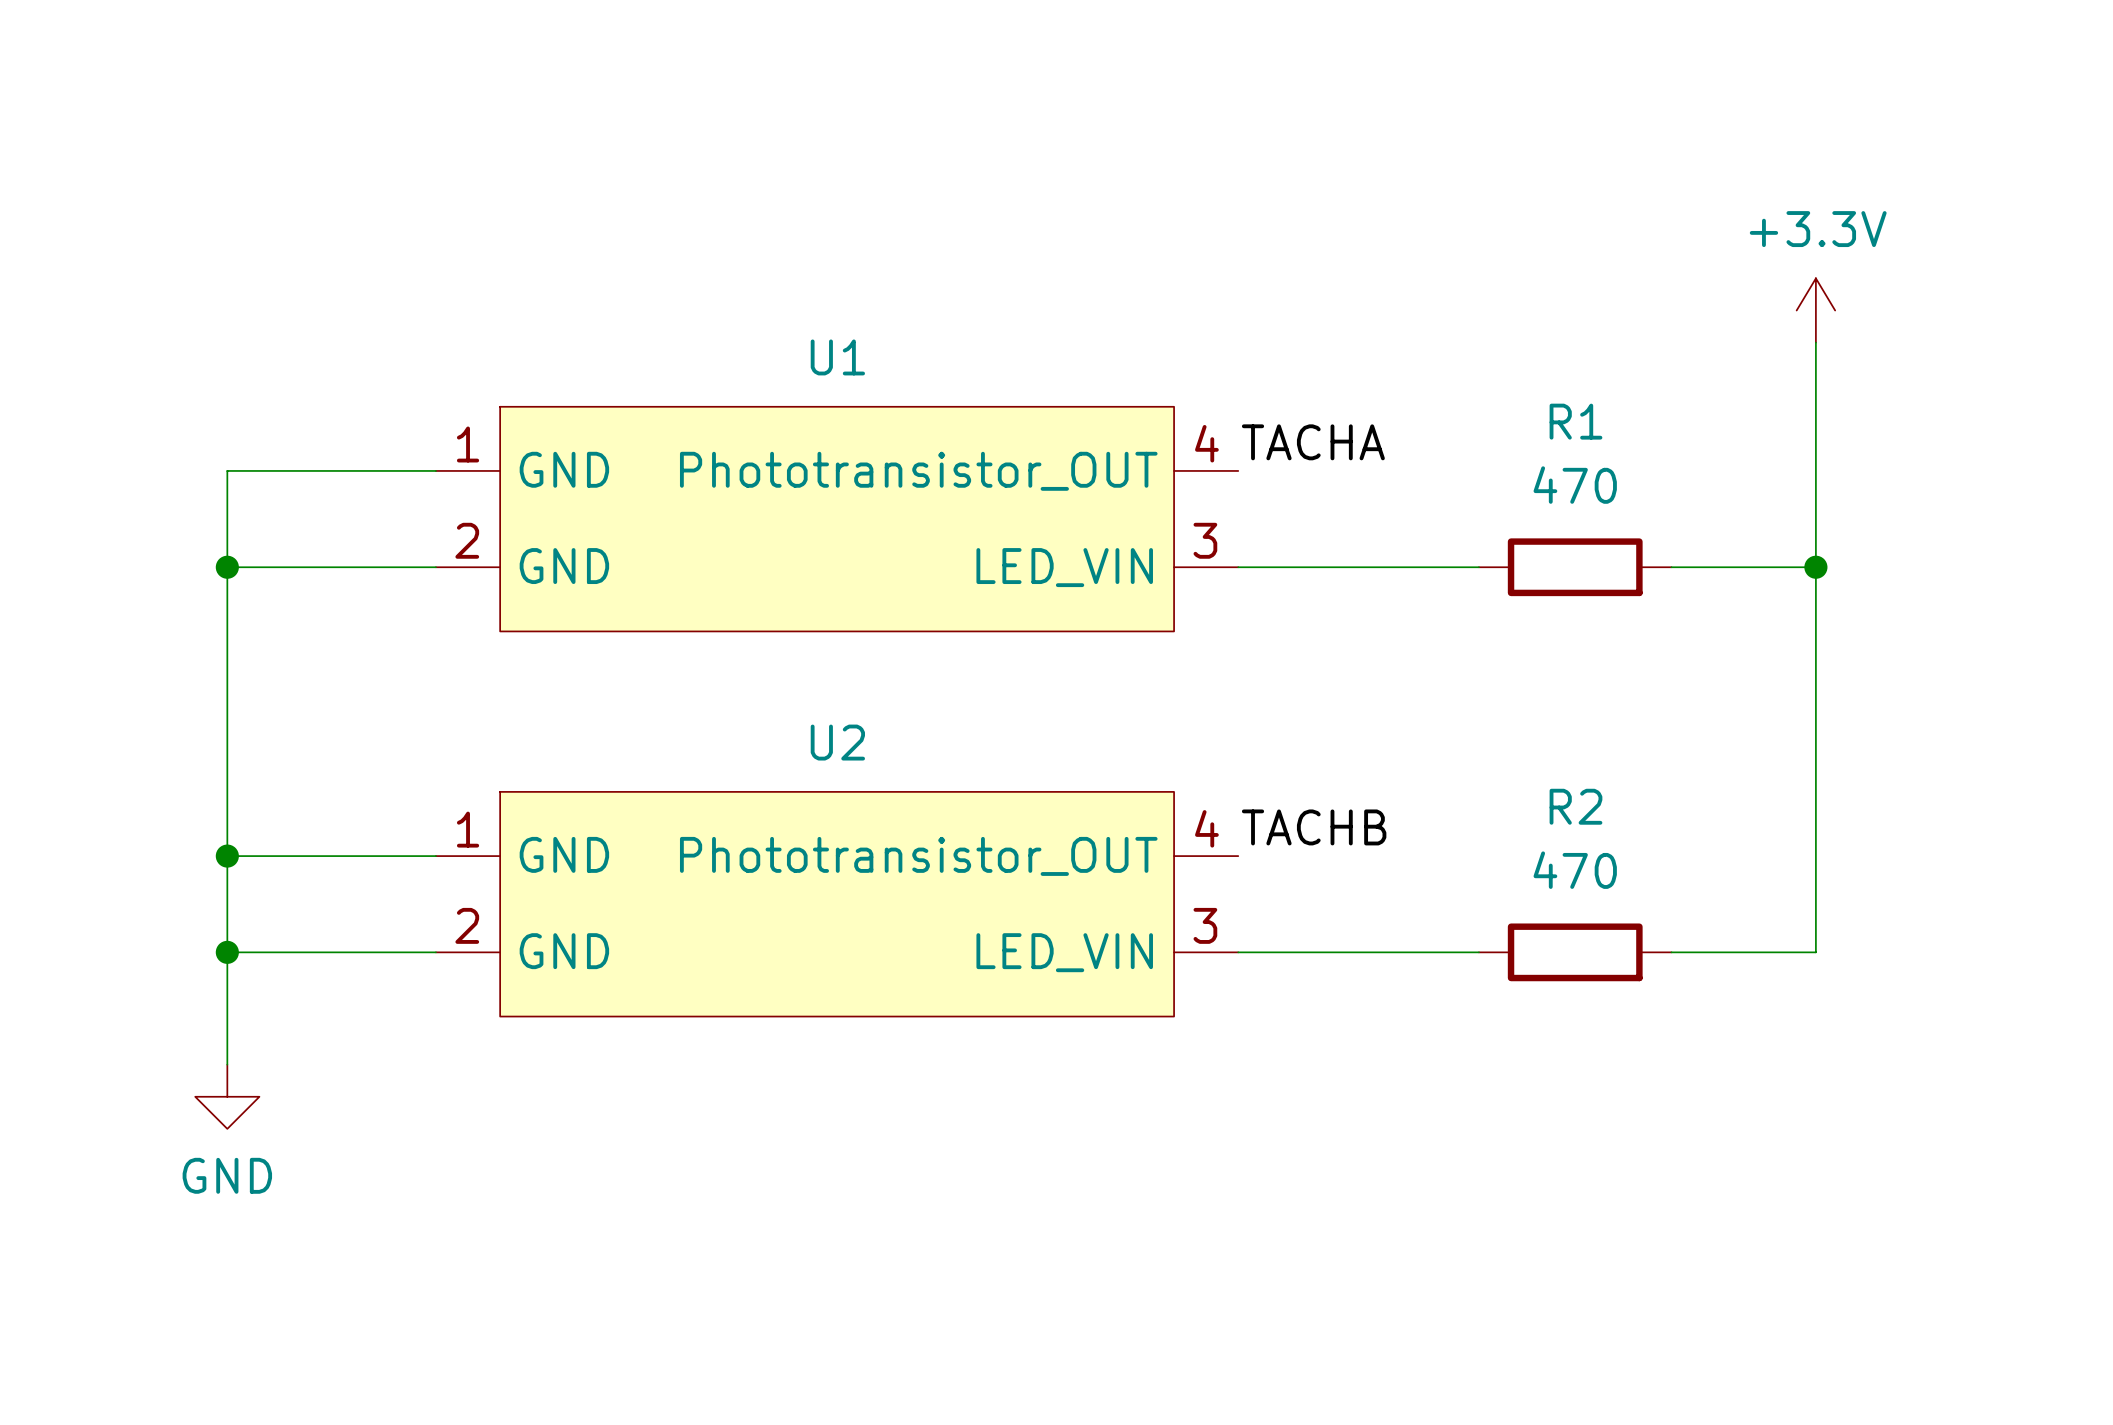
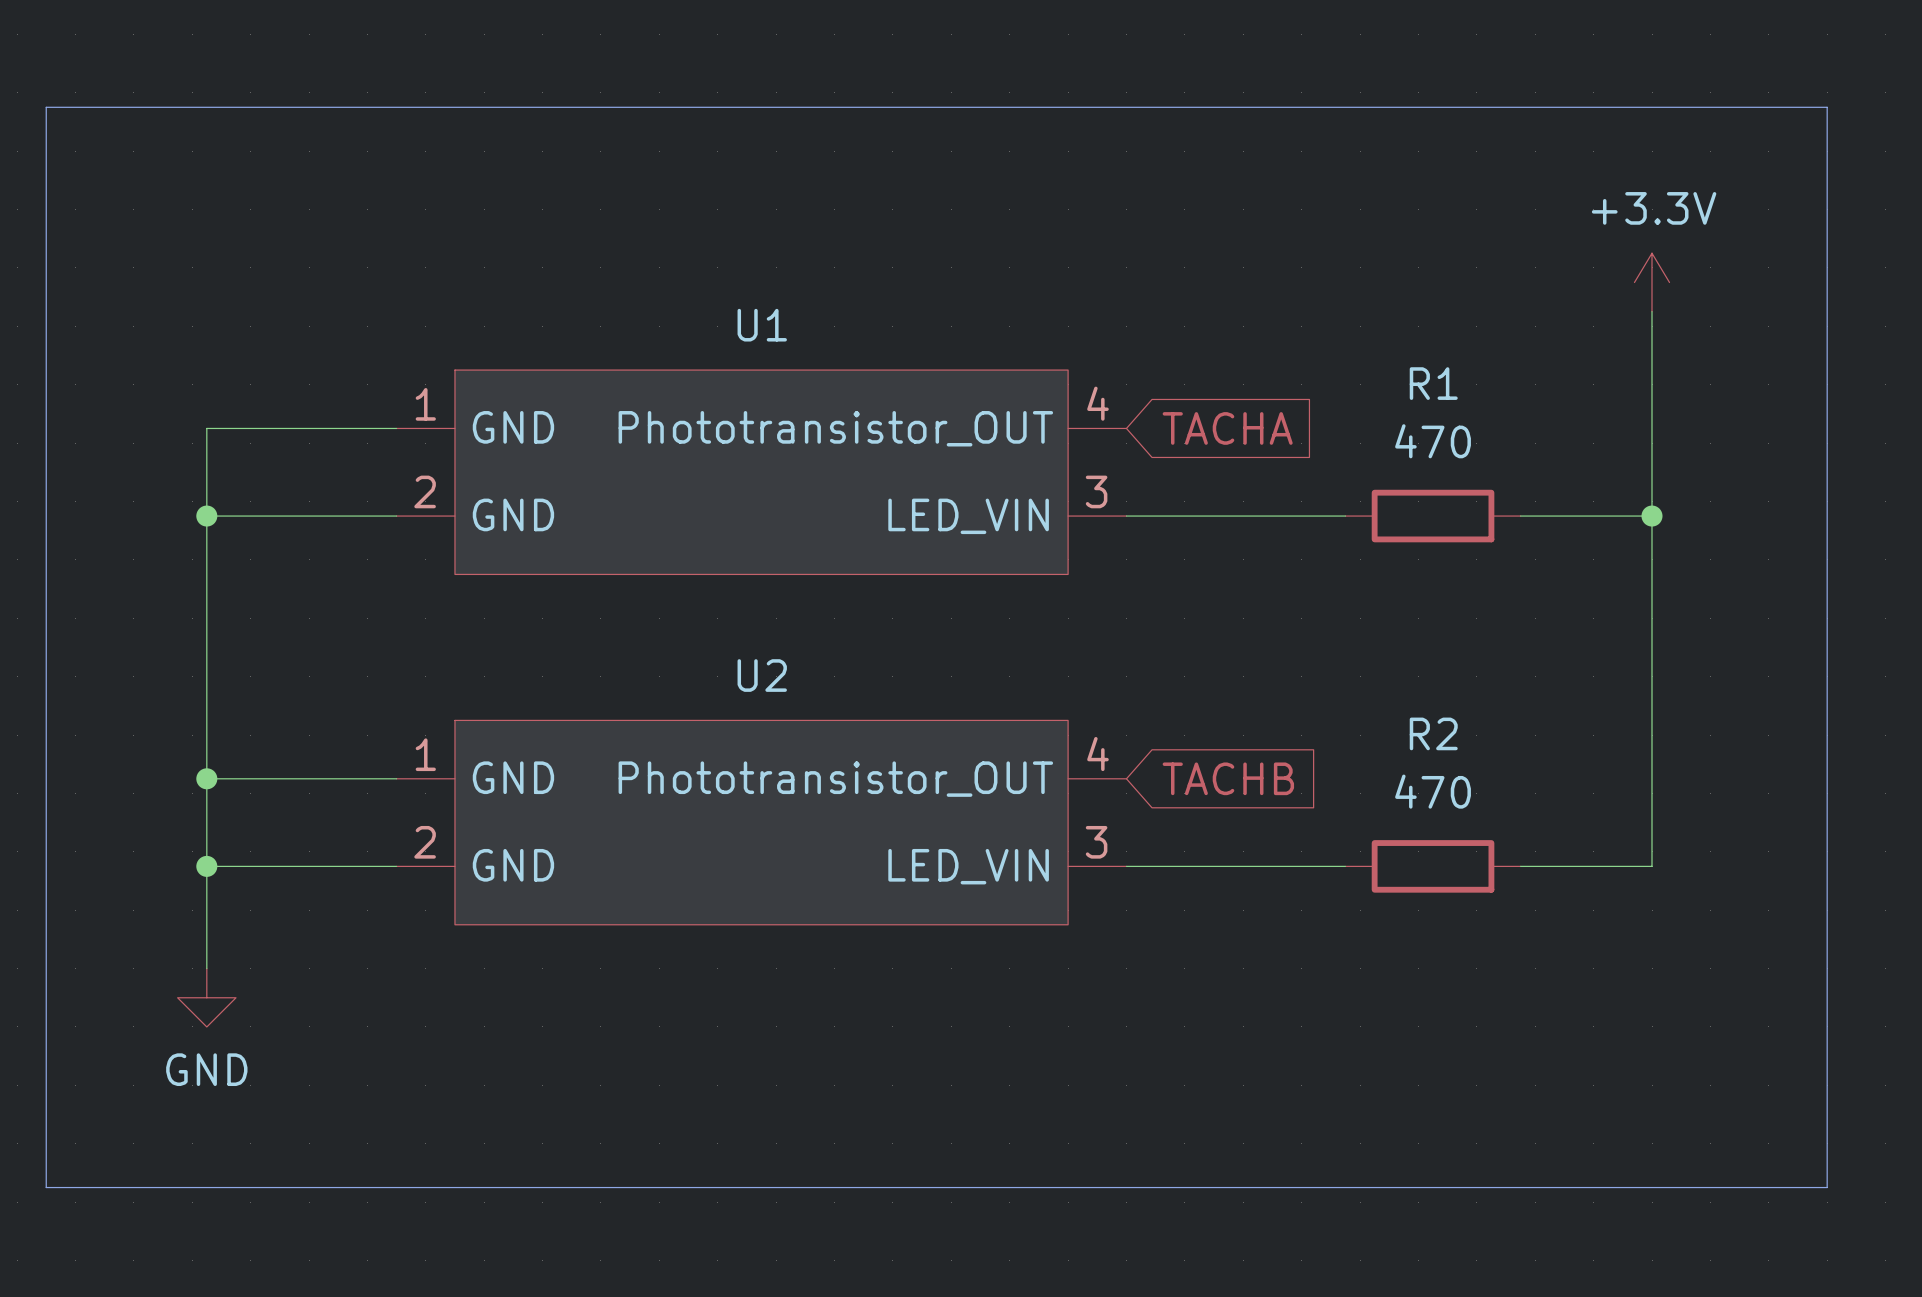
line: none -> (46, 107) (1827, 107) (1827, 1187) (46, 1187) (46, 107)
label: TACHA (1313, 442) -> none
global label: none -> TACHA (1227, 428)
label: TACHB (1314, 827) -> none
global label: none -> TACHB (1228, 778)

